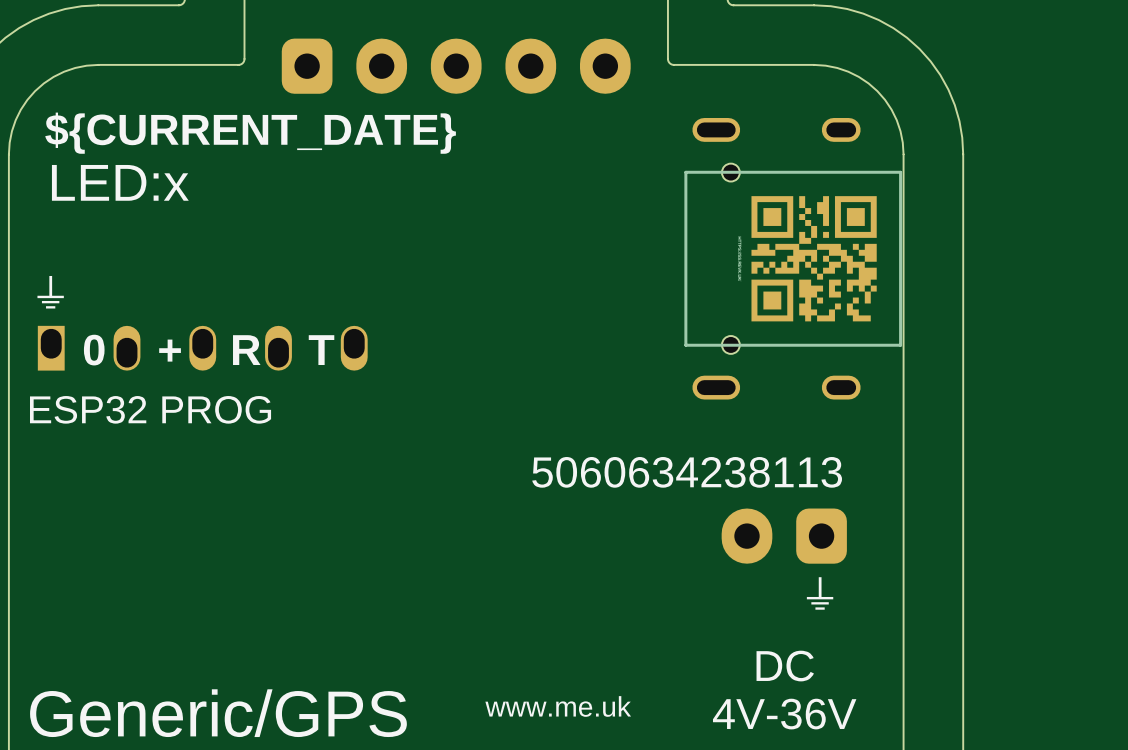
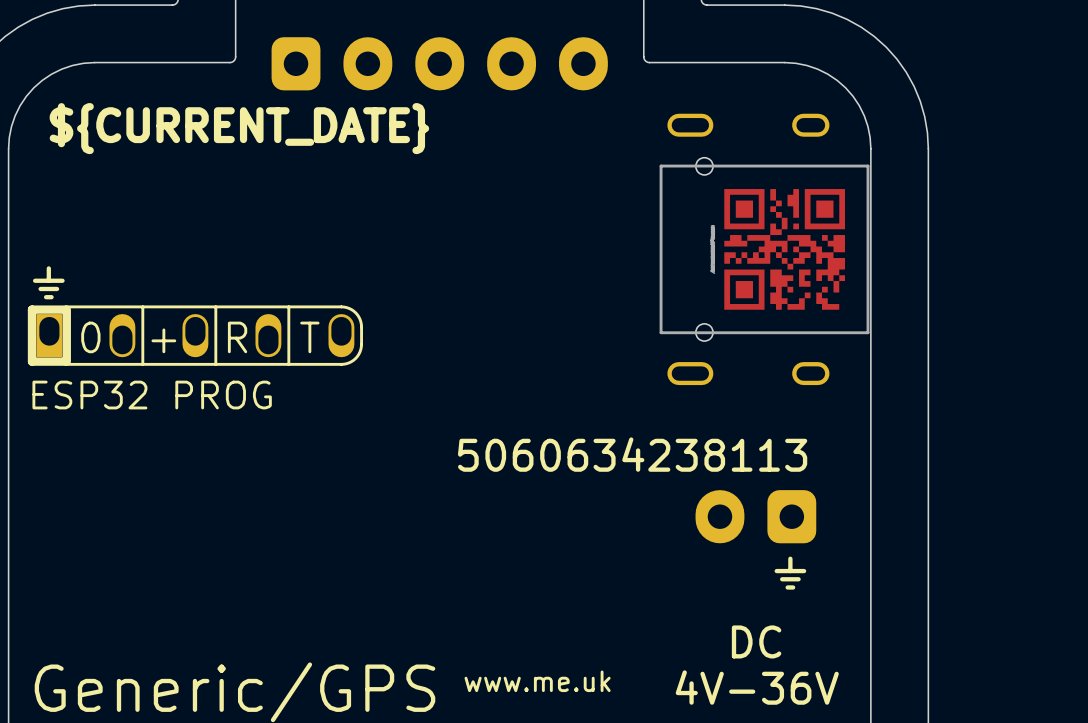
text: LED:x (120, 182) -> none
part footprint: [37, 325, 368, 371] -> [27, 305, 363, 366]

